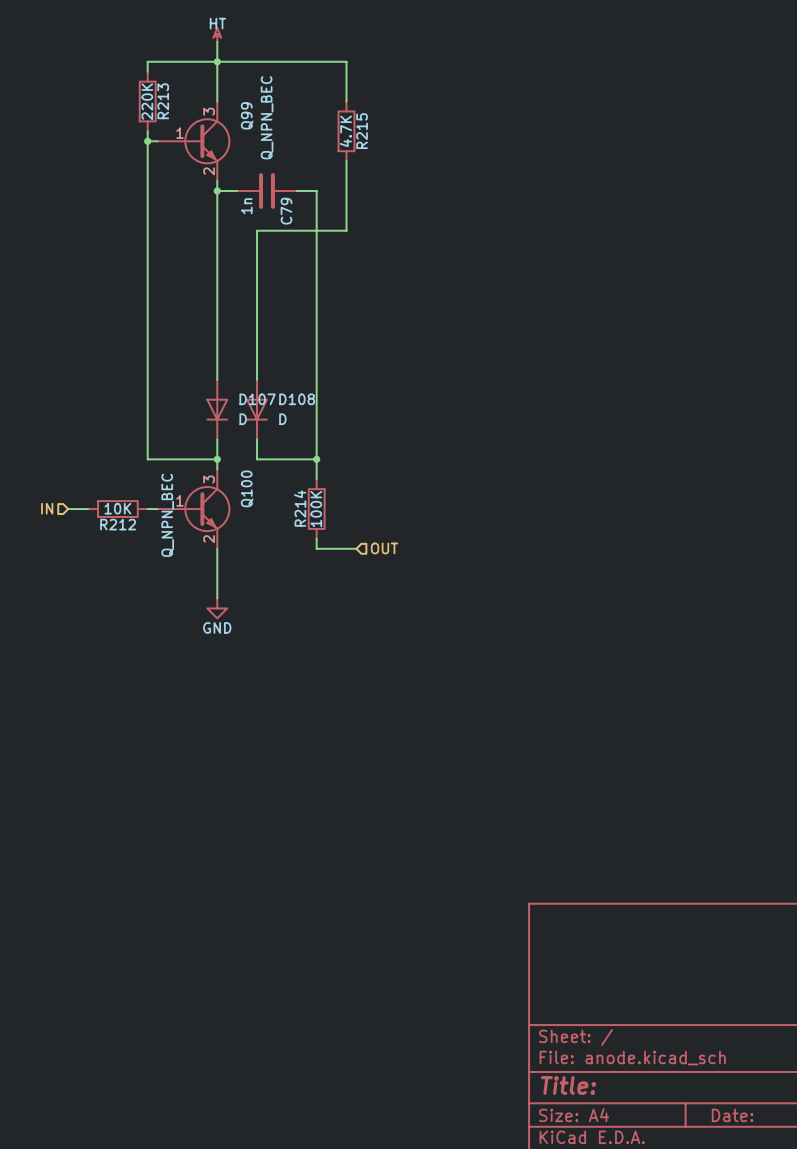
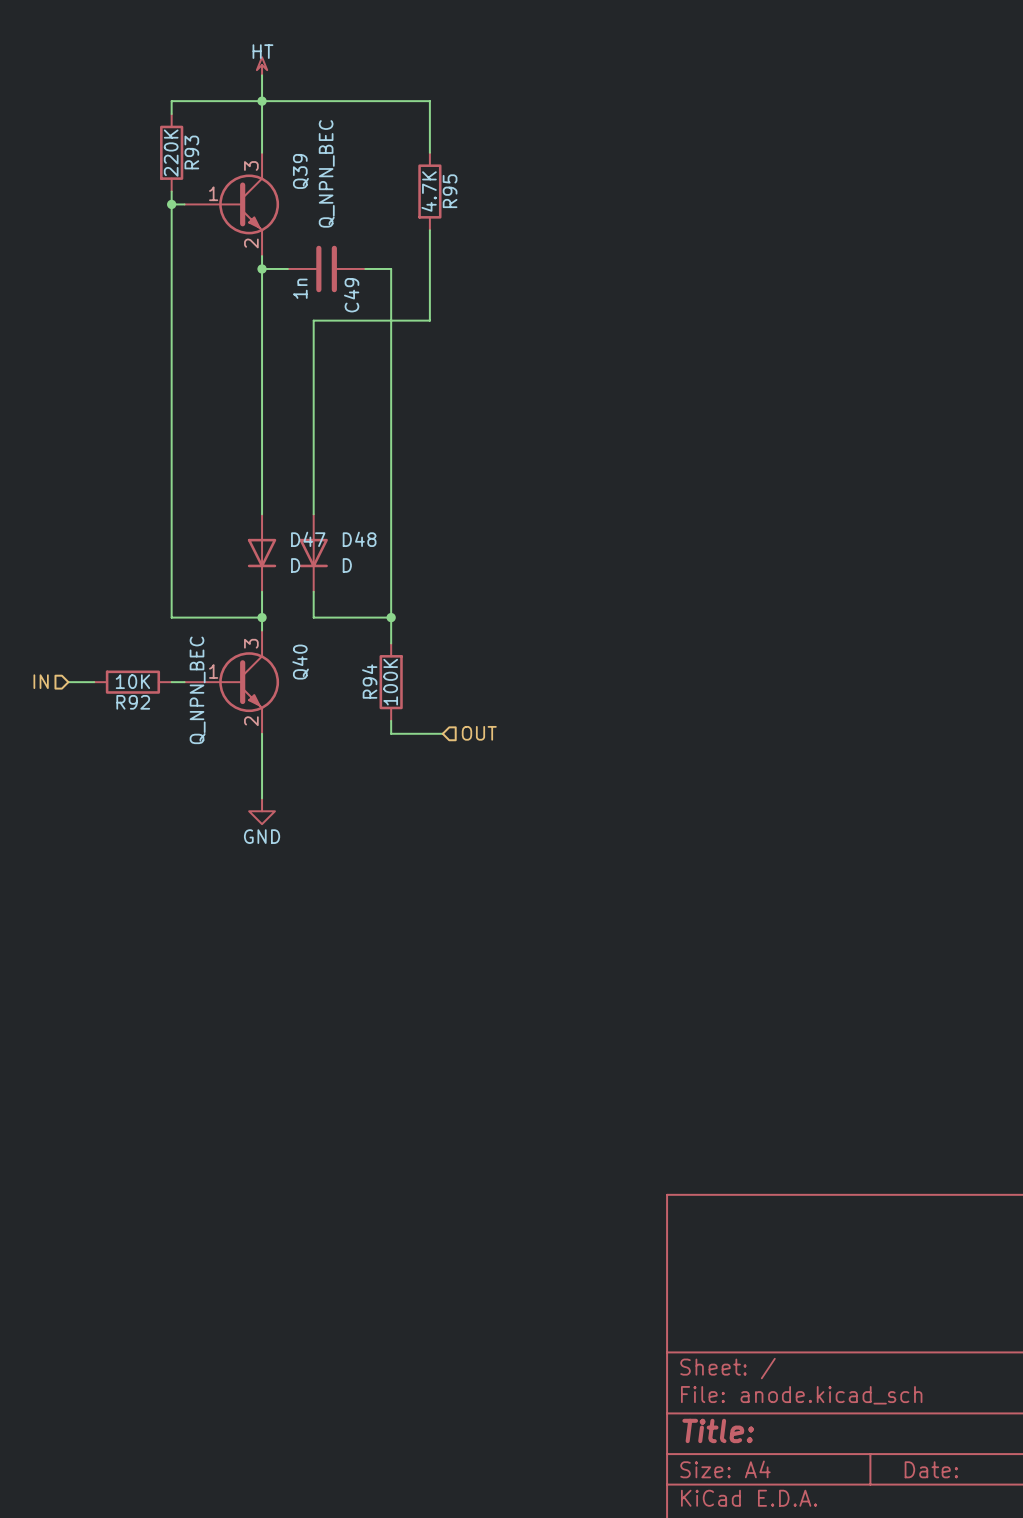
R213 name: R213 (163, 101) -> R93 (191, 152)
Q99 name: Q99 (247, 115) -> Q39 (300, 171)
R215 name: R215 (362, 131) -> R95 (450, 191)
C79 name: C79 (286, 211) -> C49 (351, 295)
D107 name: D107 (257, 399) -> D47 (308, 539)
D108 name: D108 (297, 399) -> D48 (359, 539)
Q100 name: Q100 (247, 488) -> Q40 (300, 662)
R214 name: R214 (300, 508) -> R94 (369, 681)
R212 name: R212 (118, 524) -> R92 (133, 702)

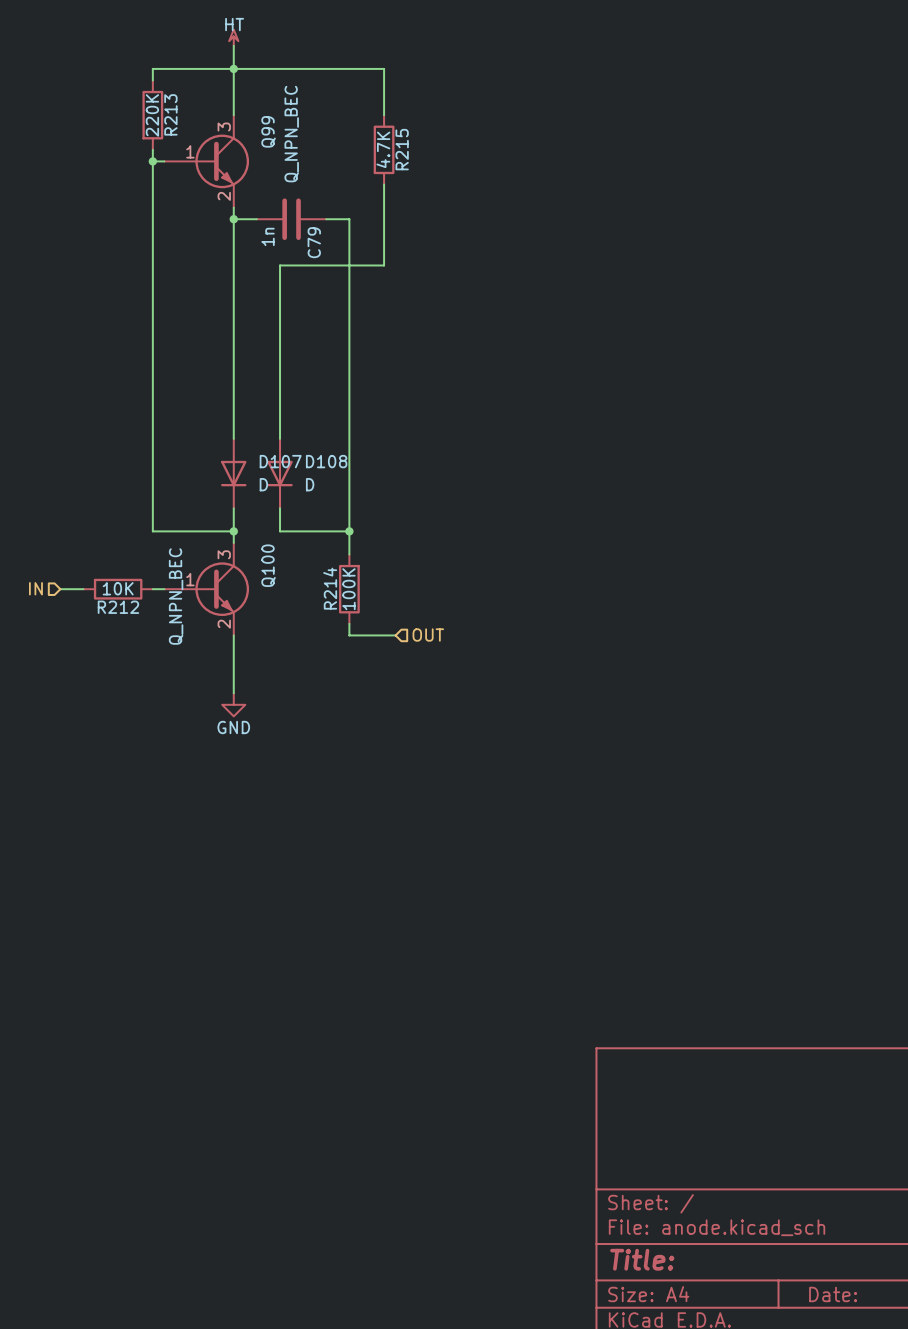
R93 name: R93 (191, 152) -> R213 (170, 114)
Q39 name: Q39 (300, 171) -> Q99 (268, 131)
R95 name: R95 (450, 191) -> R215 (402, 149)
C49 name: C49 (351, 295) -> C79 (314, 242)
D47 name: D47 (308, 539) -> D107 (280, 461)
D48 name: D48 (359, 539) -> D108 (326, 461)
Q40 name: Q40 (300, 662) -> Q100 (268, 565)
R94 name: R94 (369, 681) -> R214 (330, 588)
R92 name: R92 (133, 702) -> R212 (118, 607)

